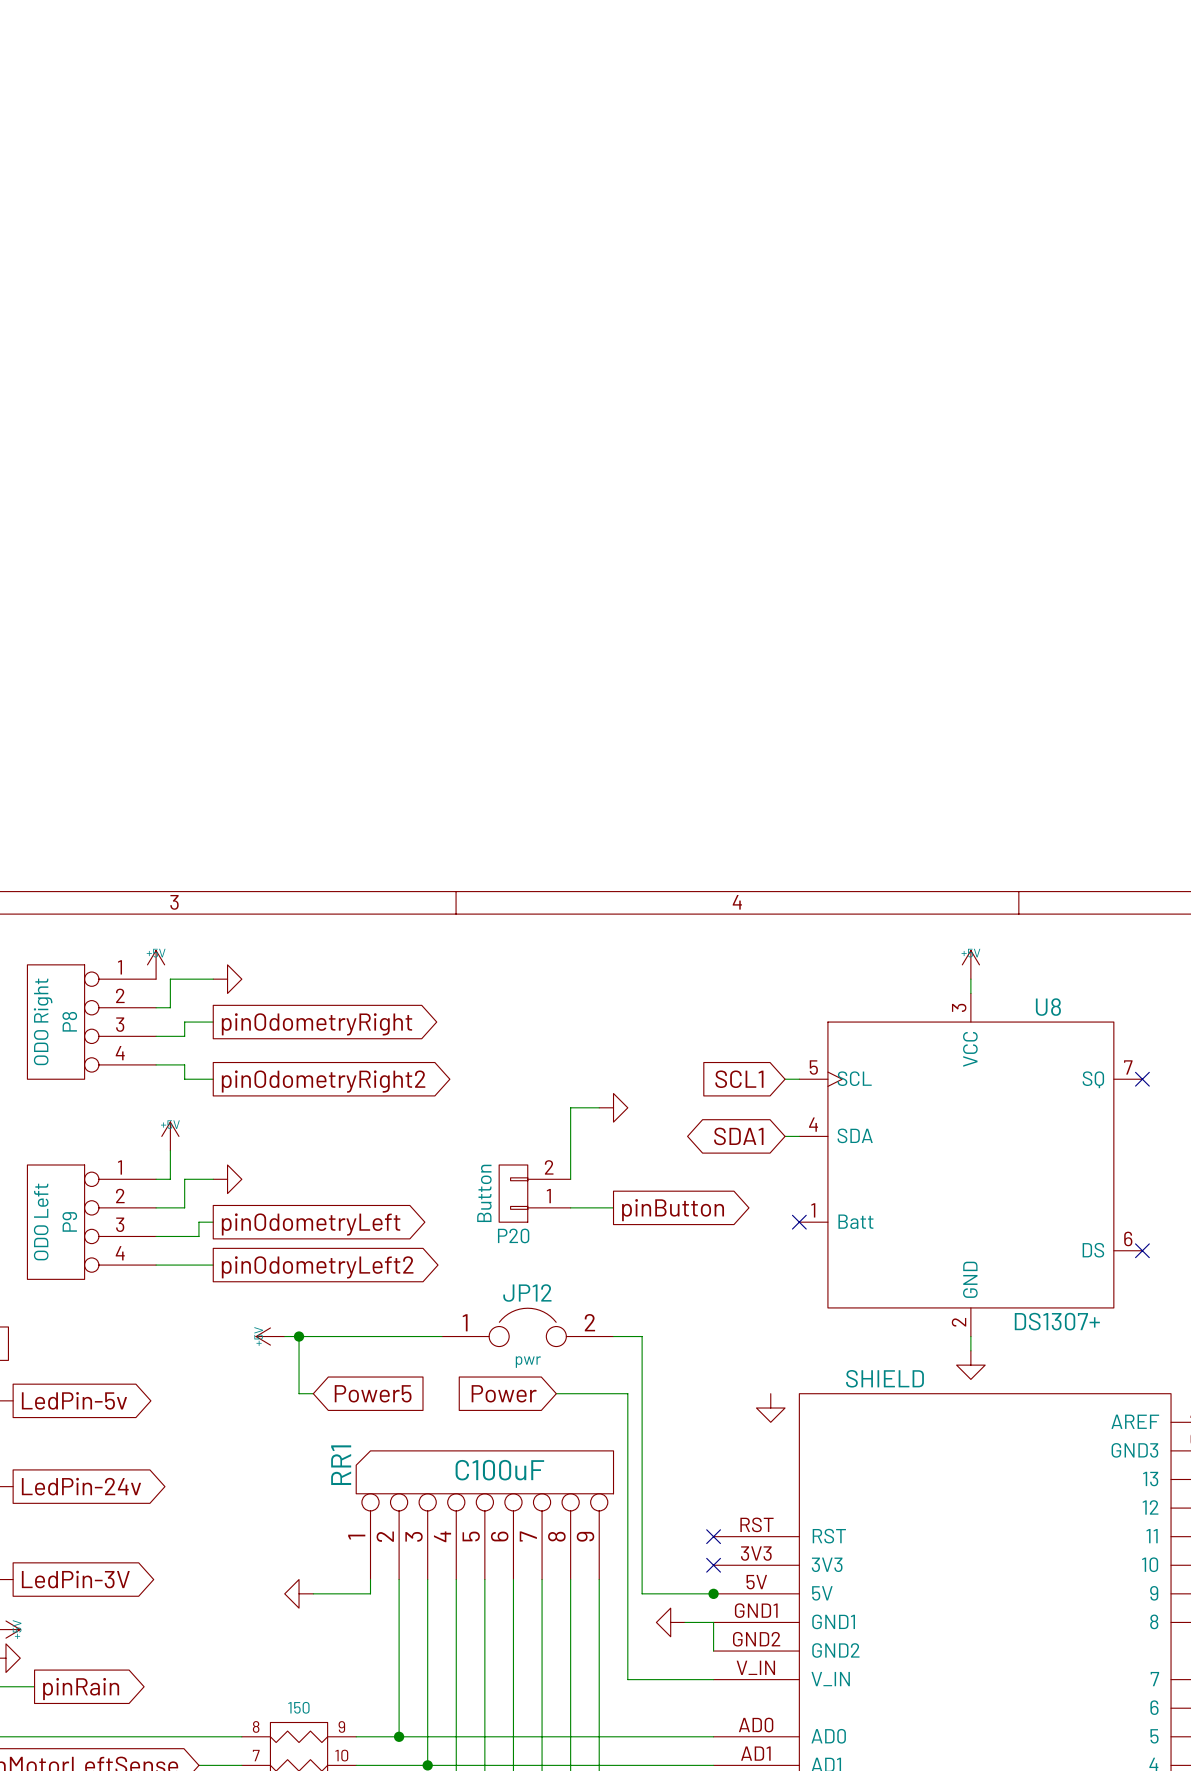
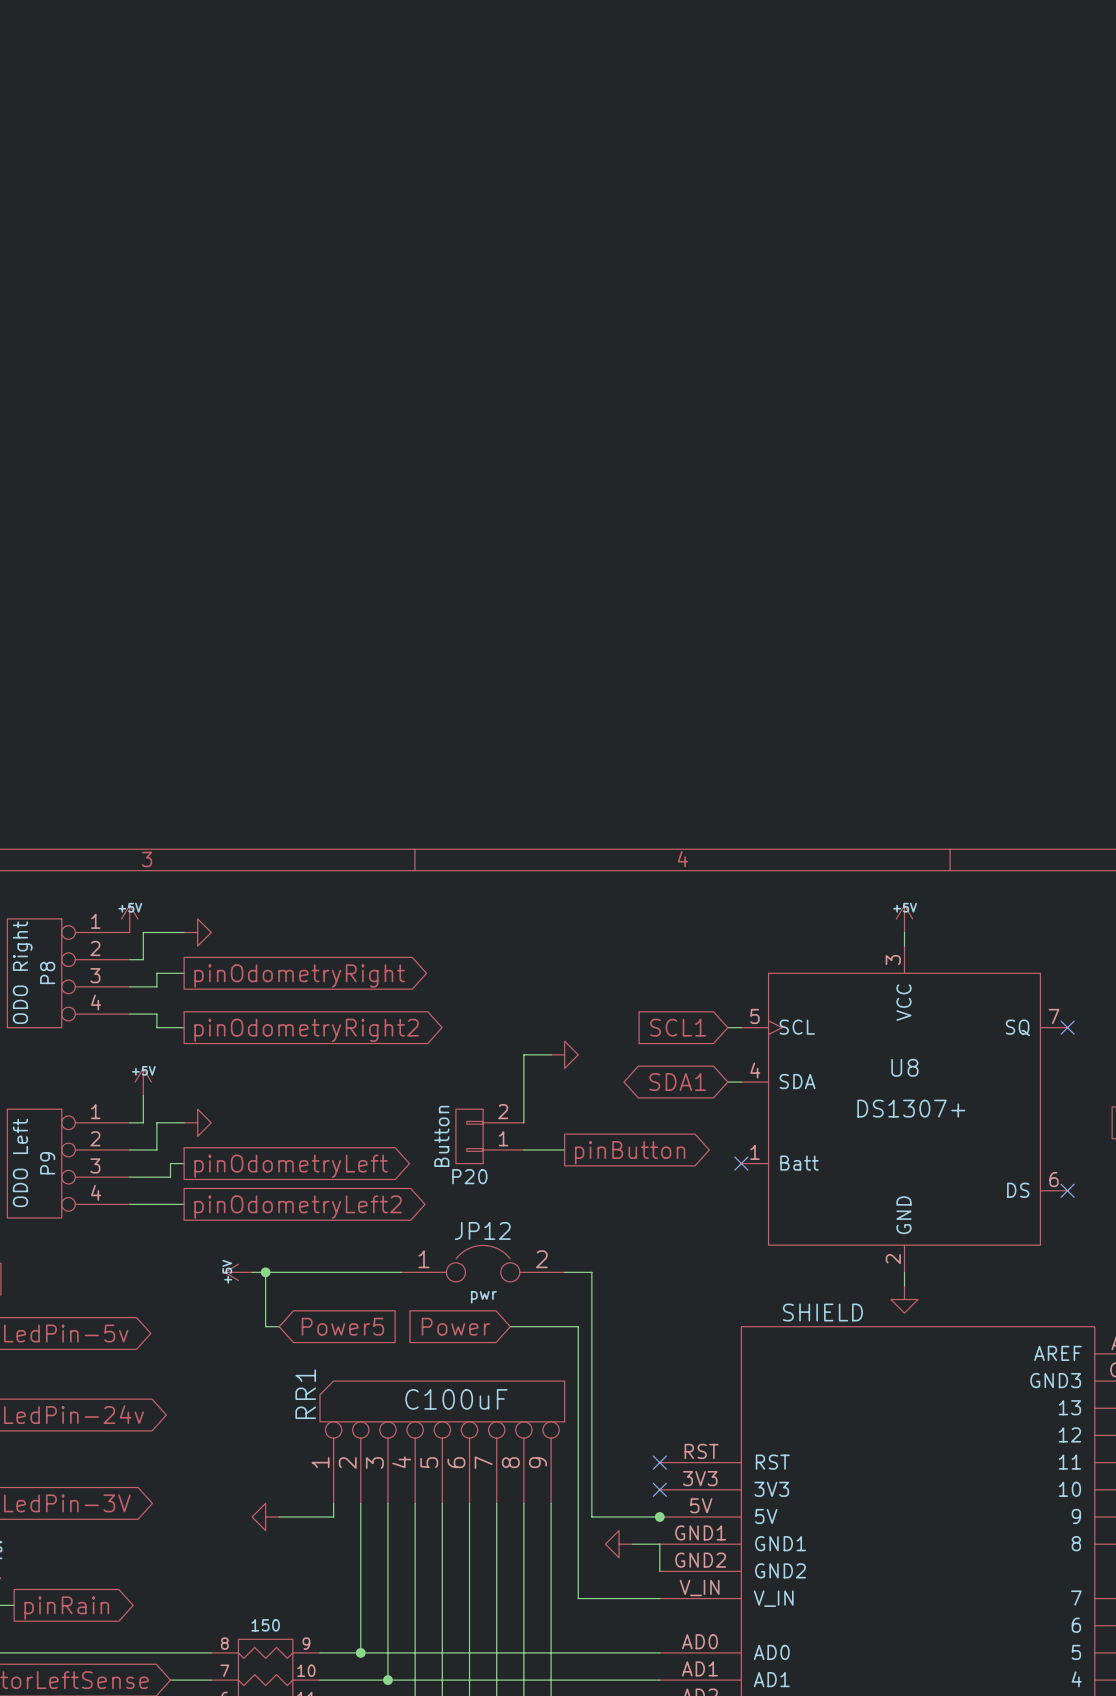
U8 name position: U8 (1048, 1007) -> U8 (904, 1067)
U8 value position: DS1307+ (1057, 1321) -> DS1307+ (911, 1108)
power symbol: (770, 1408) -> none

